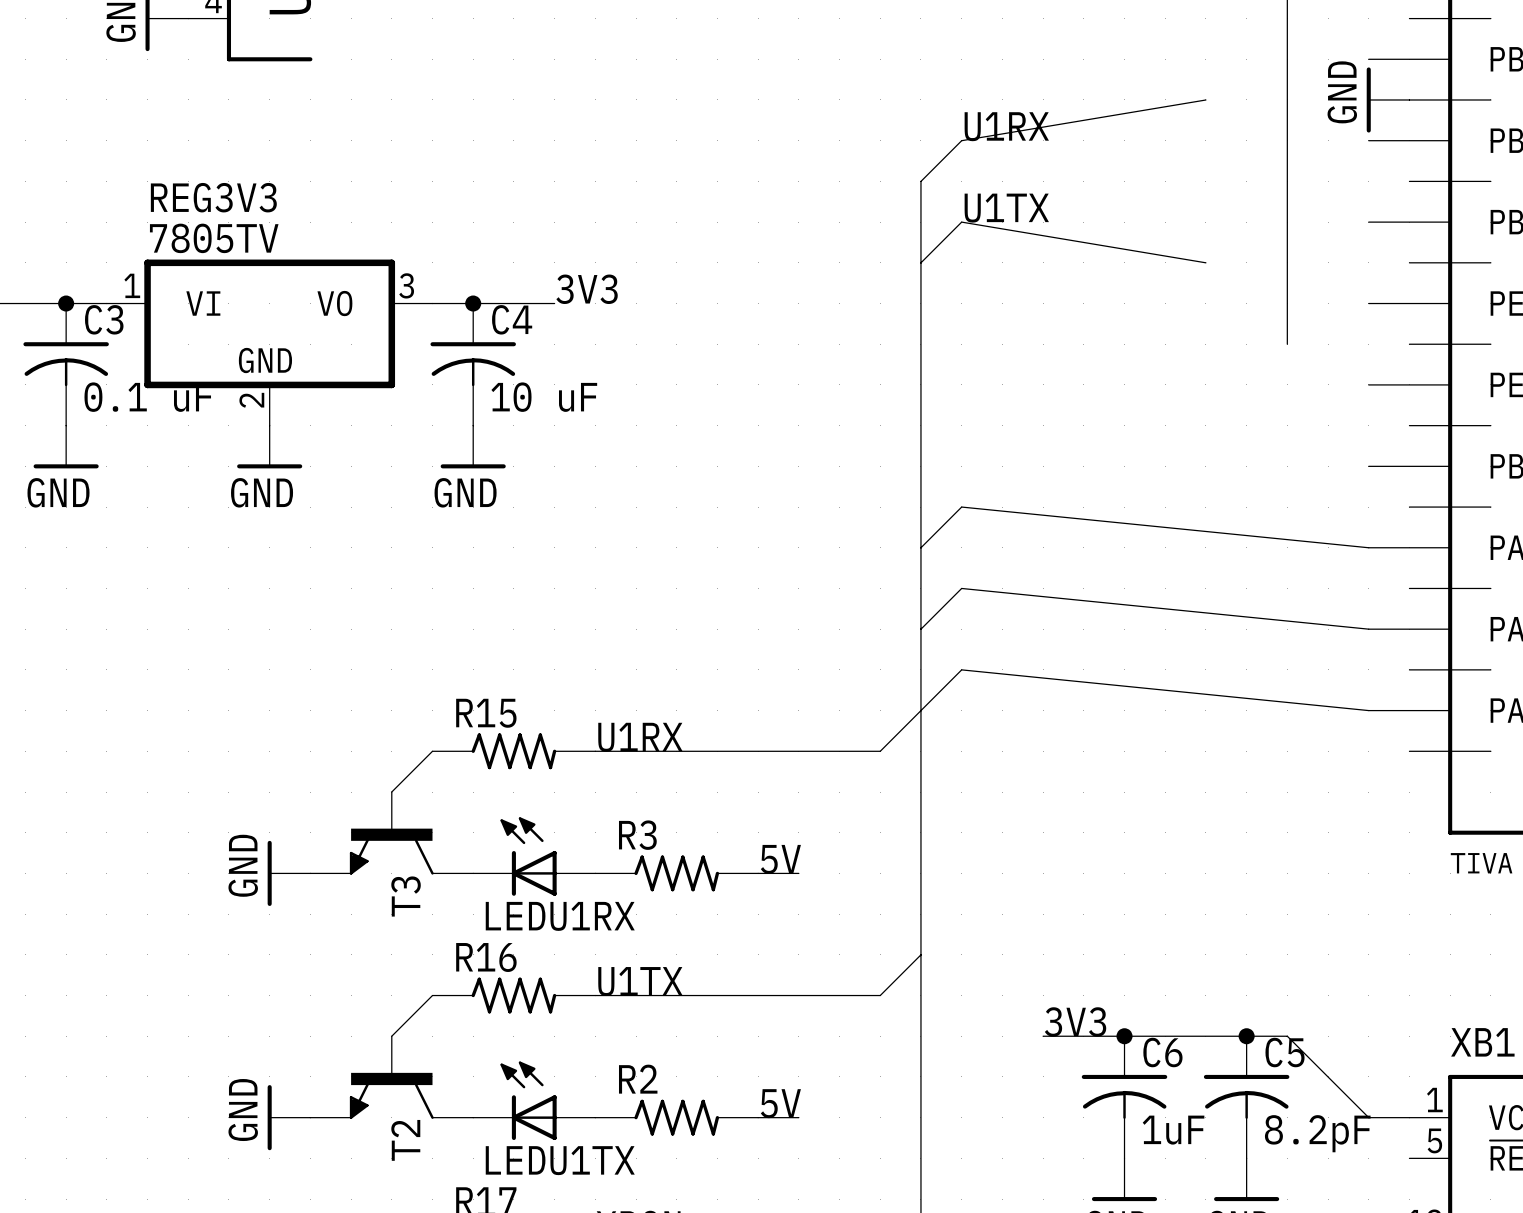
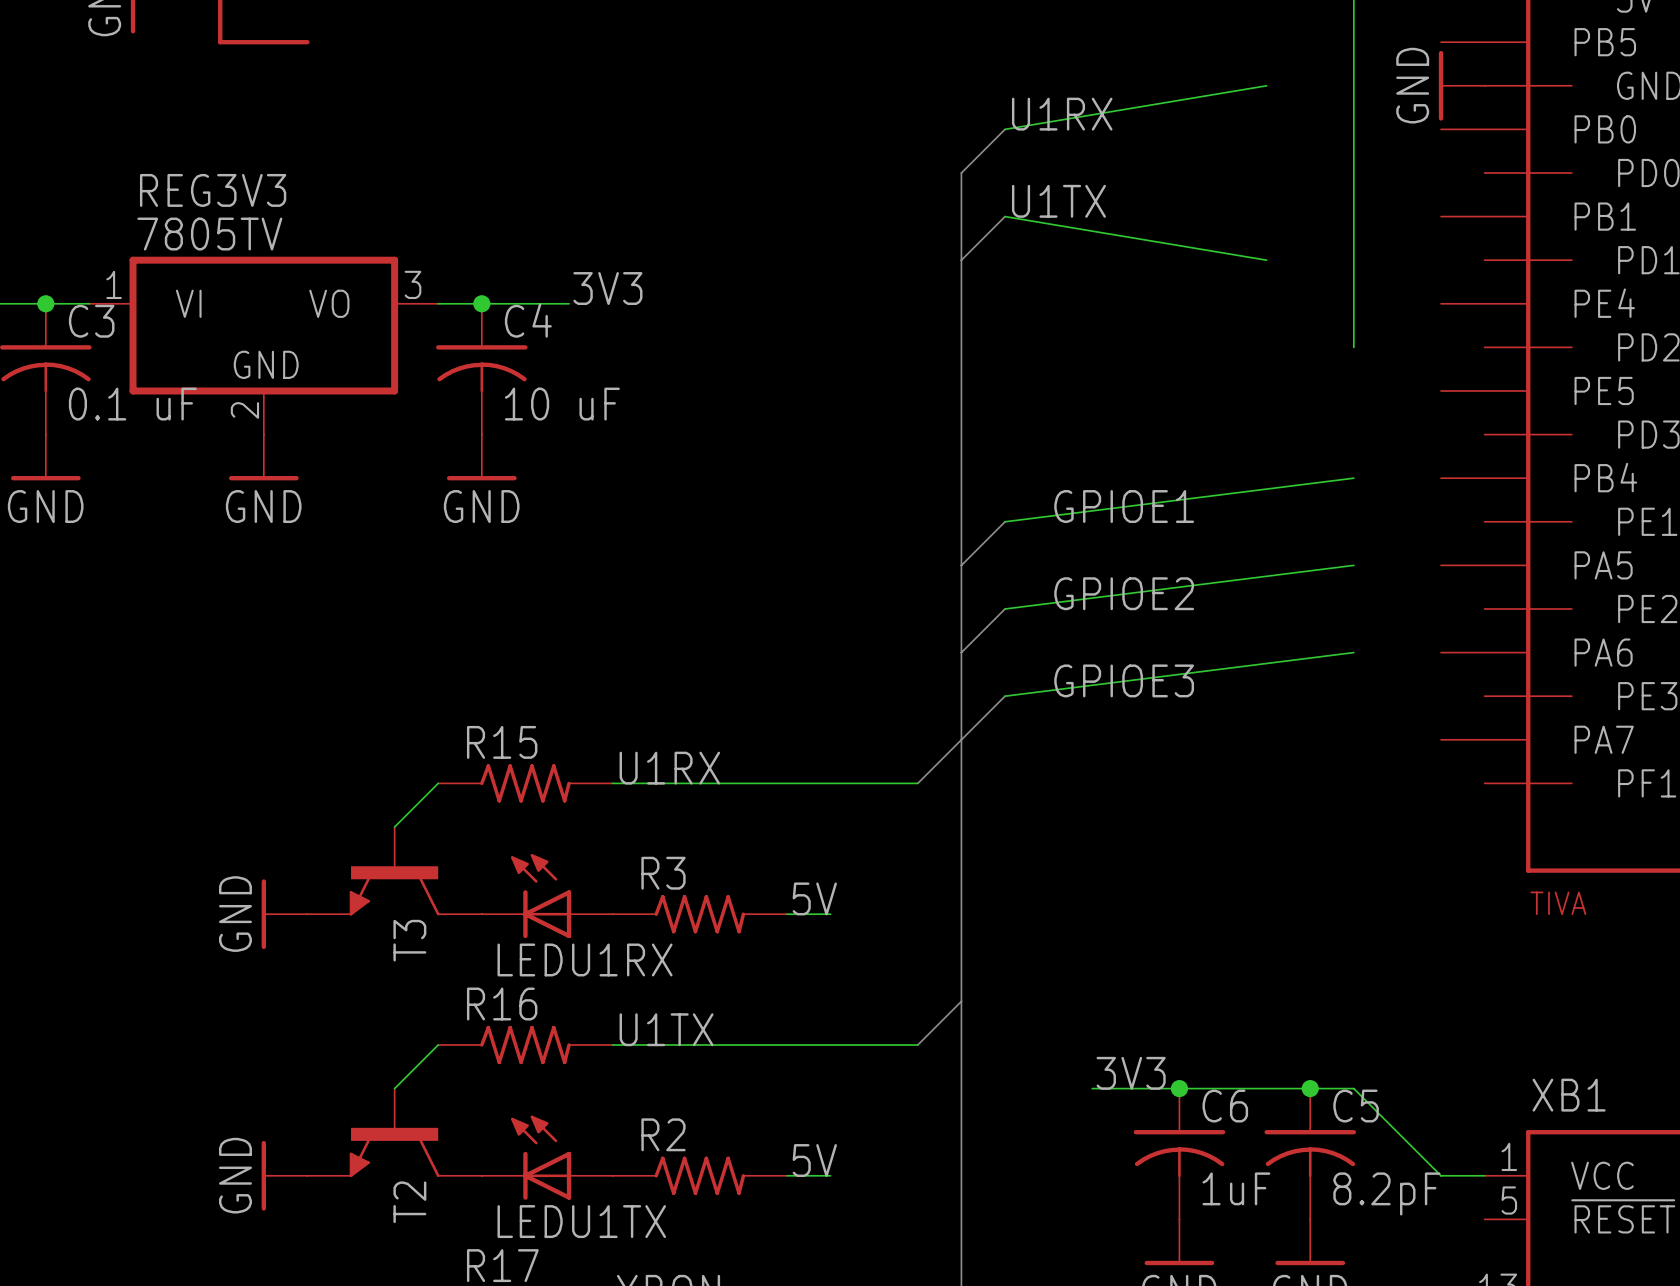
label: none -> GPIOE1 (1124, 506)
wire: (961, 507) (1368, 547) -> (1005, 521) (1353, 478)
label: none -> GPIOE2 (1124, 593)
wire: (961, 588) (1368, 629) -> (1005, 608) (1353, 565)
label: none -> GPIOE3 (1124, 680)
wire: (961, 669) (1368, 710) -> (1005, 696) (1353, 652)

